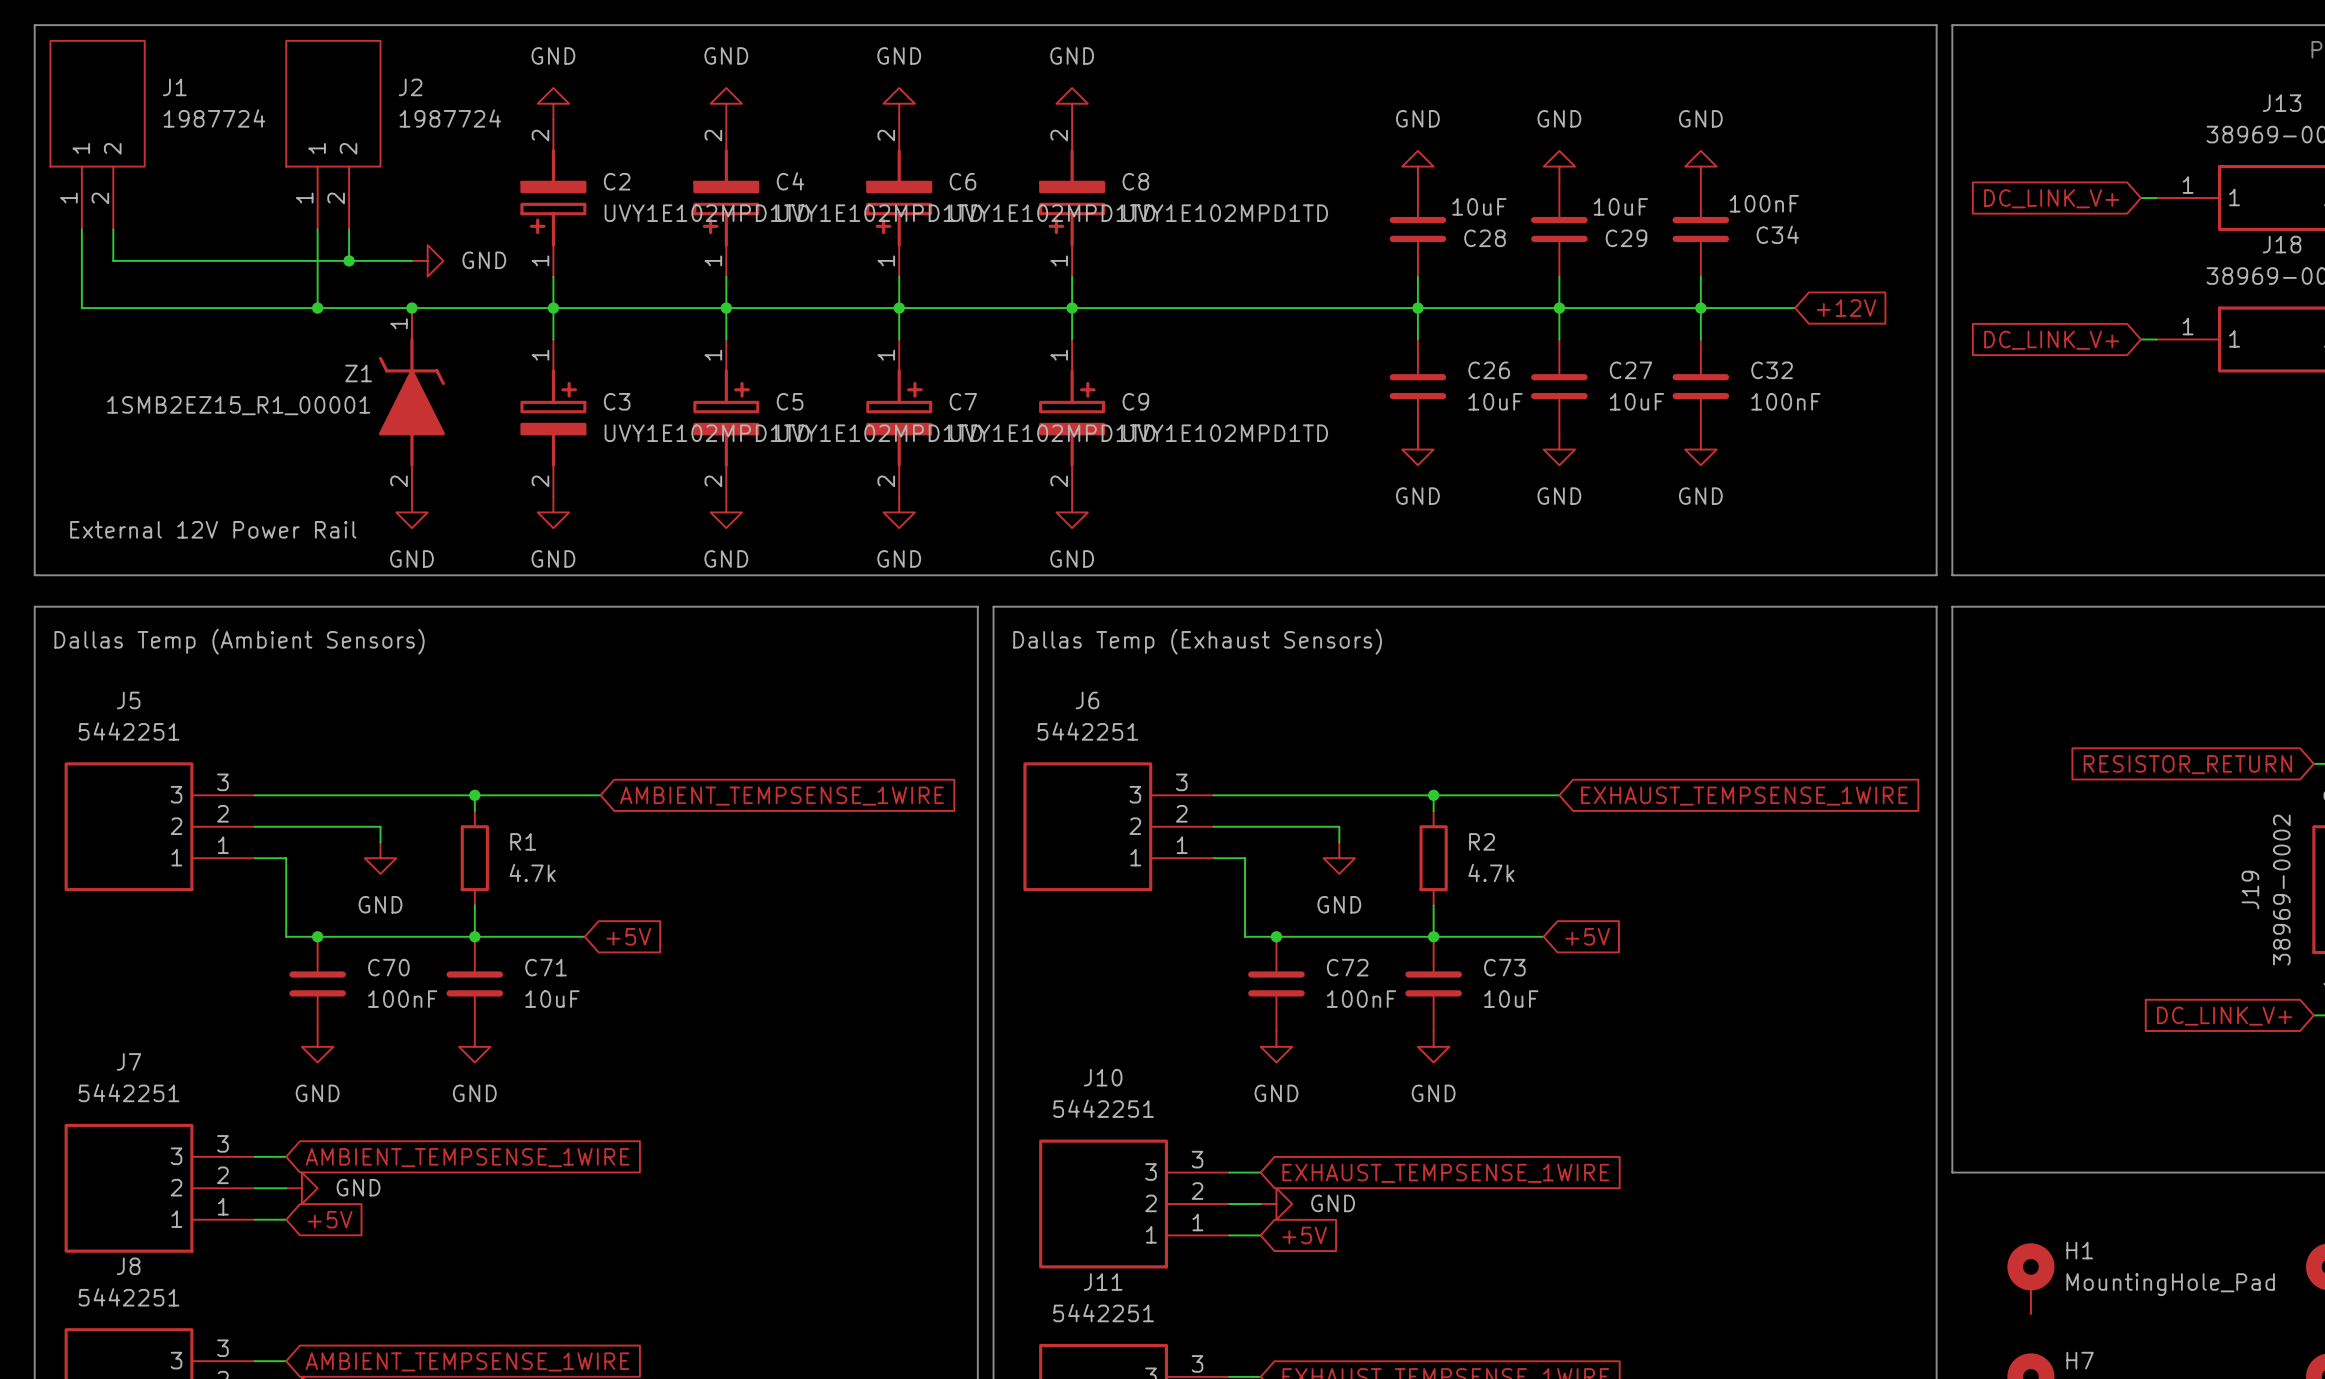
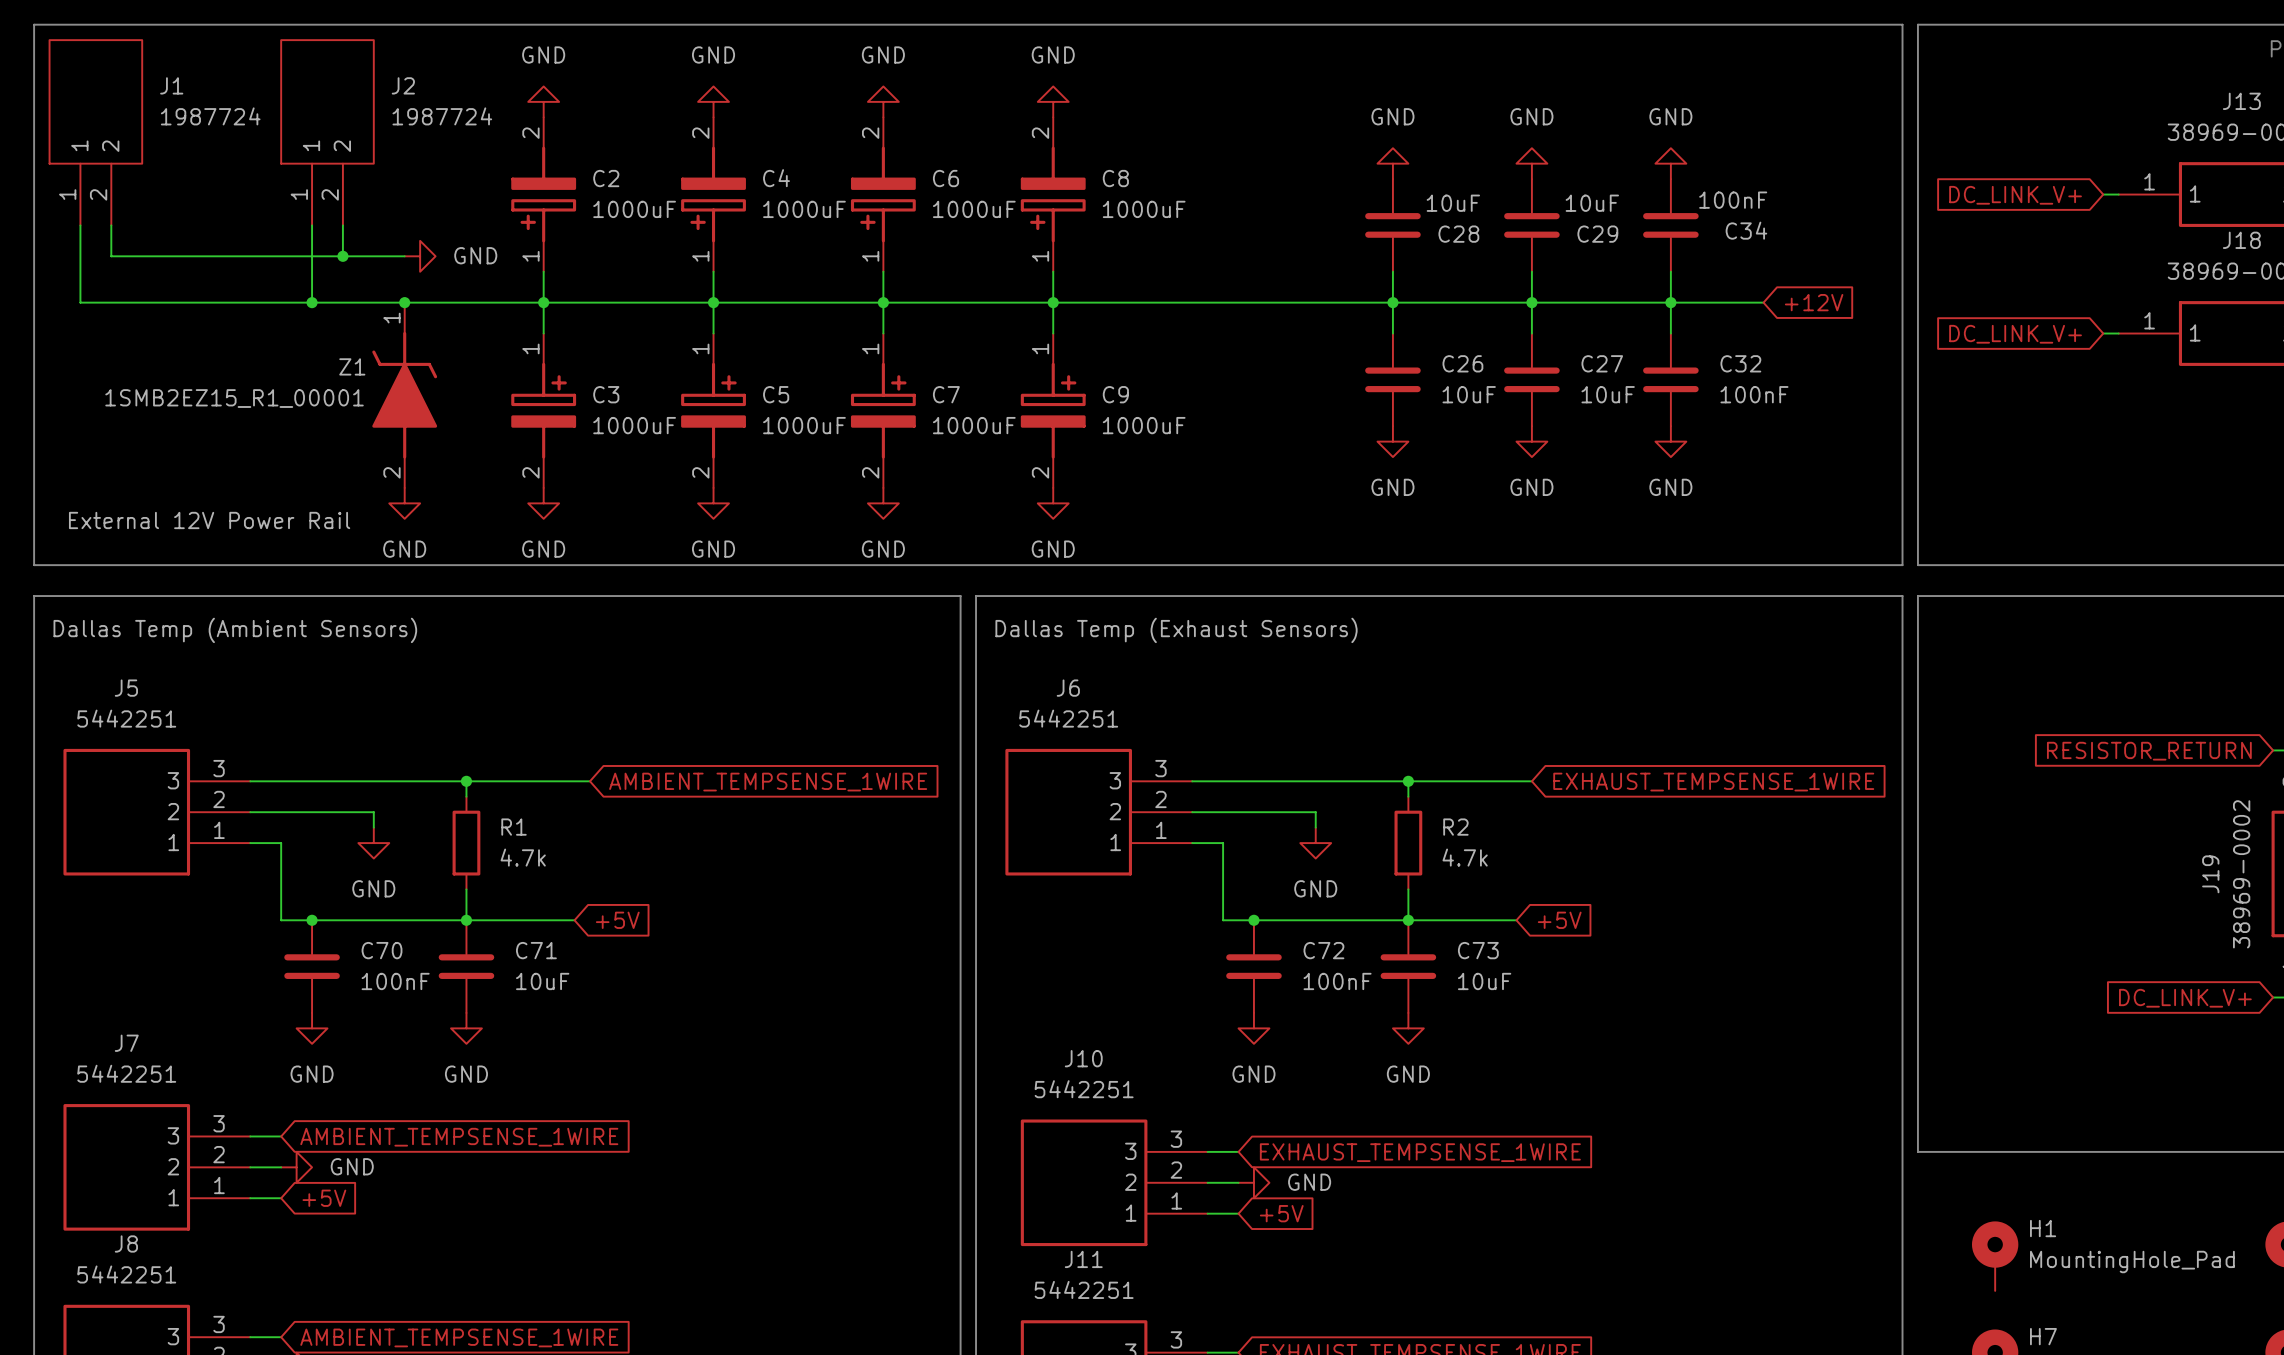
C2 value: UVY1E102MPD1TD (706, 213) -> 1000uF (634, 209)
C4 value: UVY1E102MPD1TD (879, 213) -> 1000uF (804, 209)
C6 value: UVY1E102MPD1TD (1052, 213) -> 1000uF (974, 209)
C8 value: UVY1E102MPD1TD (1225, 213) -> 1000uF (1144, 209)
C3 value: UVY1E102MPD1TD (706, 433) -> 1000uF (634, 425)
C5 value: UVY1E102MPD1TD (879, 433) -> 1000uF (804, 425)
C7 value: UVY1E102MPD1TD (1052, 433) -> 1000uF (974, 425)
C9 value: UVY1E102MPD1TD (1225, 433) -> 1000uF (1144, 425)

